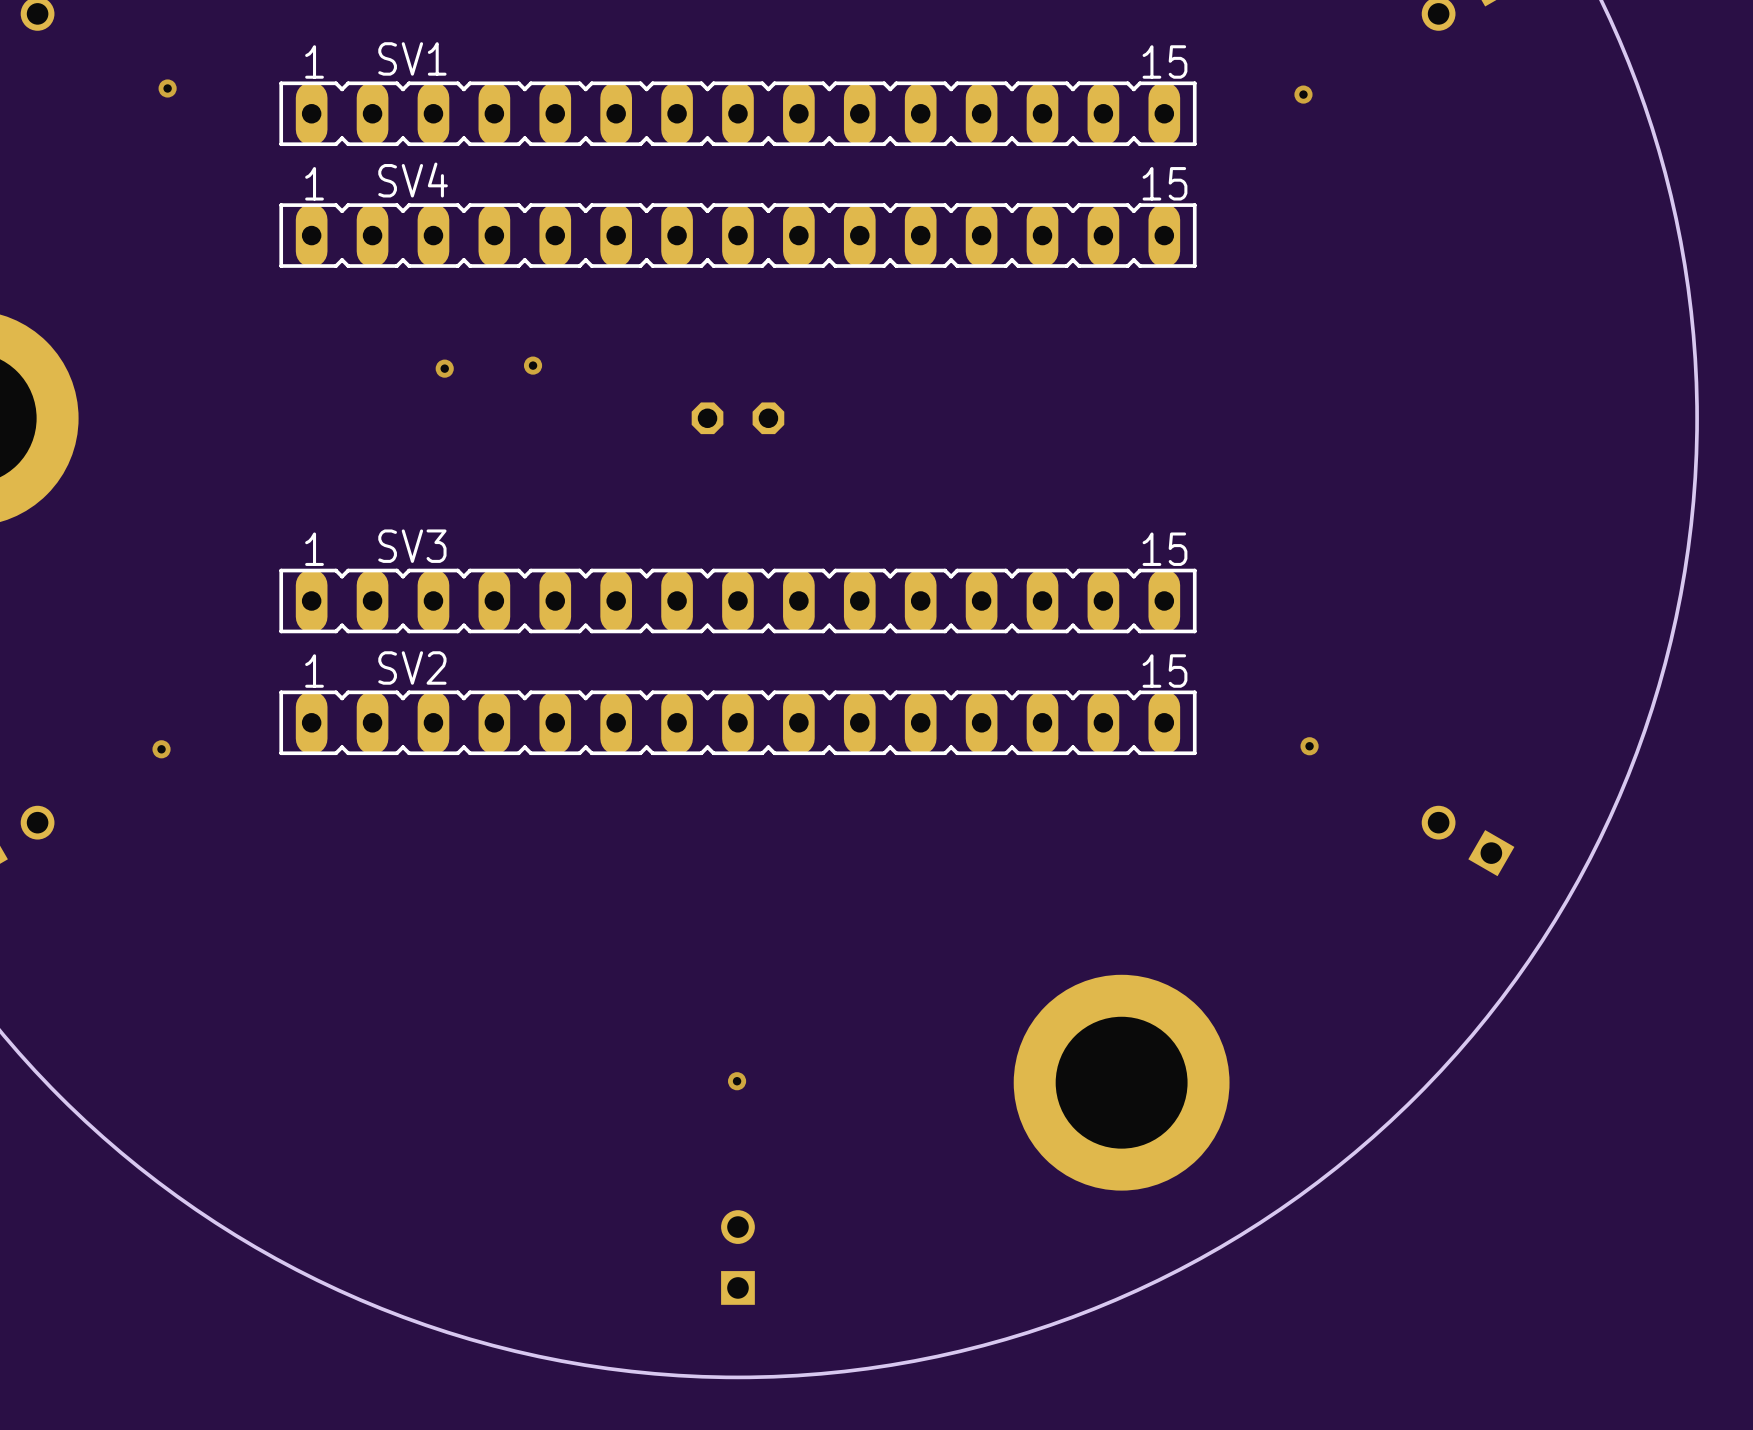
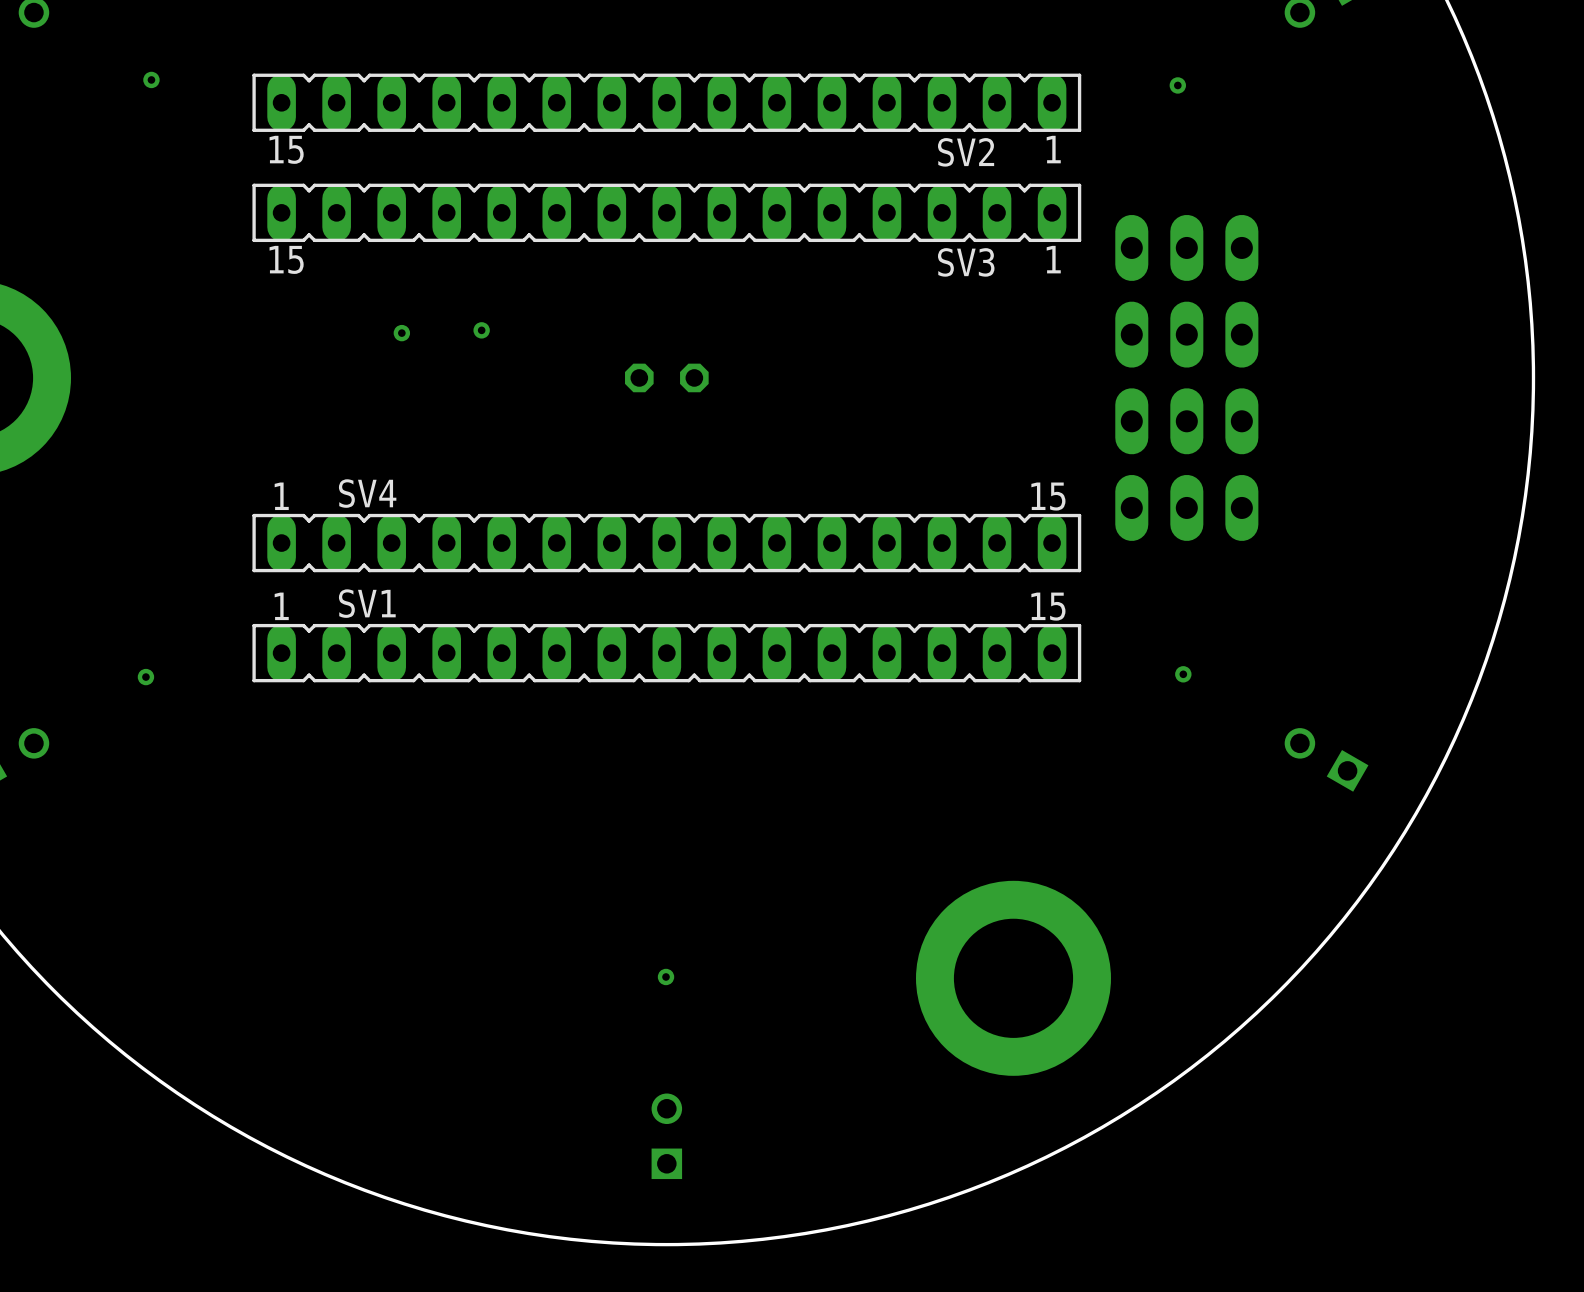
SV1 name: SV1 (412, 58) -> SV2 (966, 152)
SV1 text position: 1 (314, 61) -> 1 (1053, 149)
SV1 text position: 15 (1165, 61) -> 15 (286, 149)
SV4 name: SV4 (413, 180) -> SV3 (966, 262)
SV4 text position: 1 (314, 183) -> 1 (1053, 259)
SV4 text position: 15 (1165, 183) -> 15 (286, 259)
part: none -> (1186, 247)
part: none -> (1186, 334)
part: none -> (1186, 421)
SV3 name: SV3 (412, 546) -> SV4 (367, 493)
part: none -> (1186, 507)
SV2 name: SV2 (412, 667) -> SV1 (367, 603)

